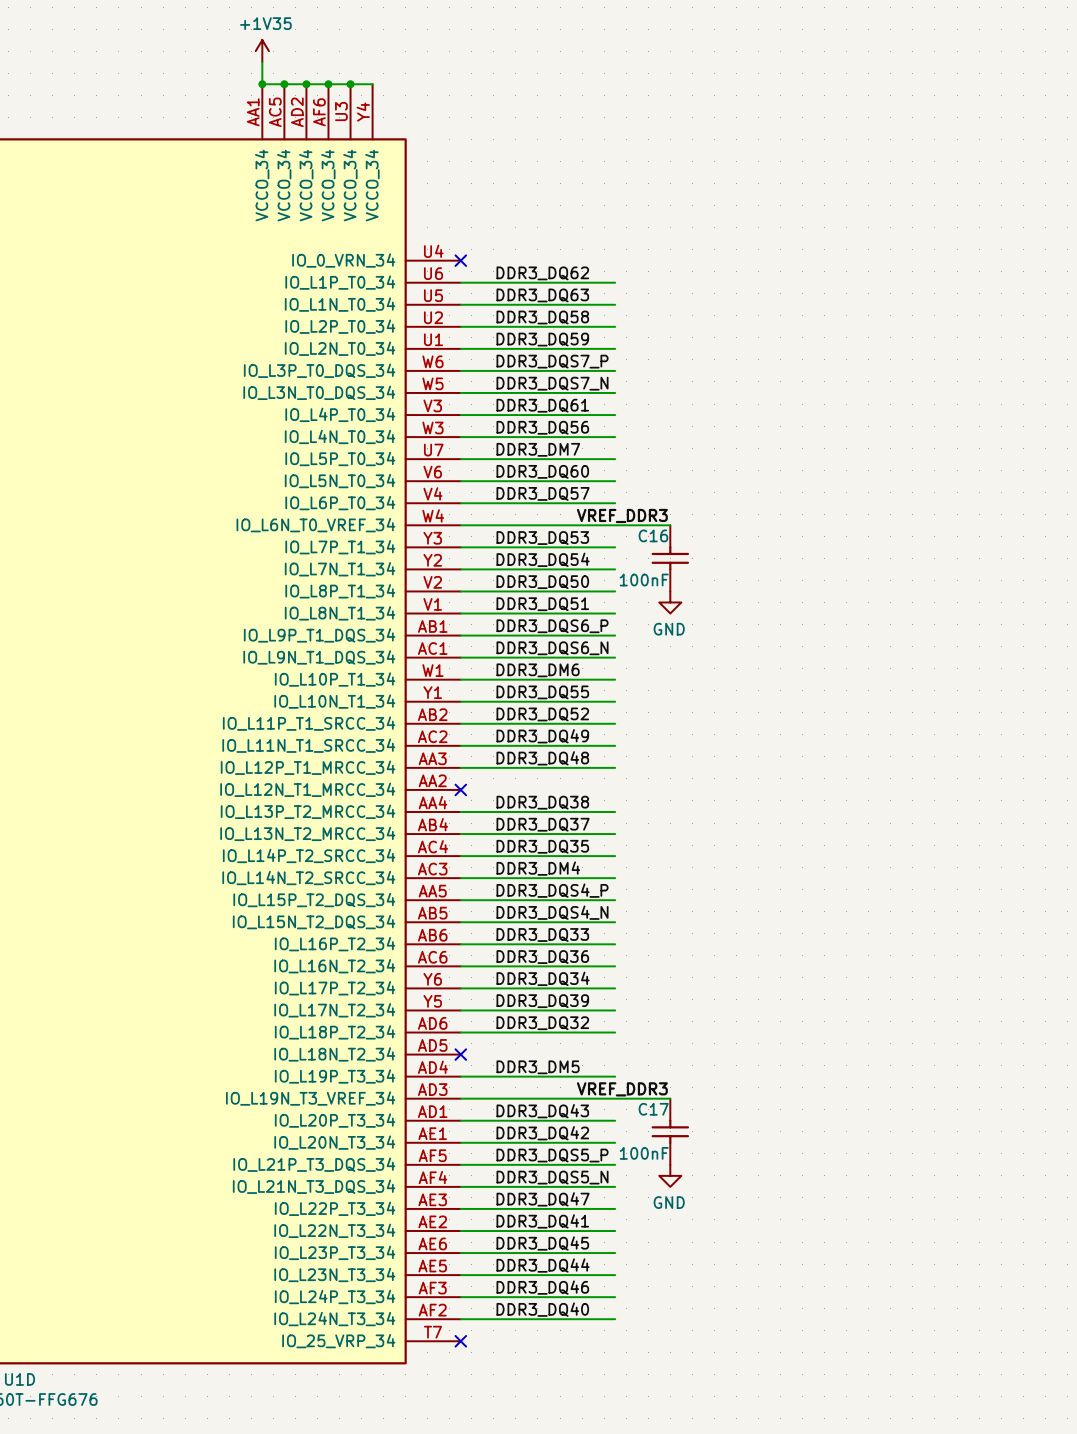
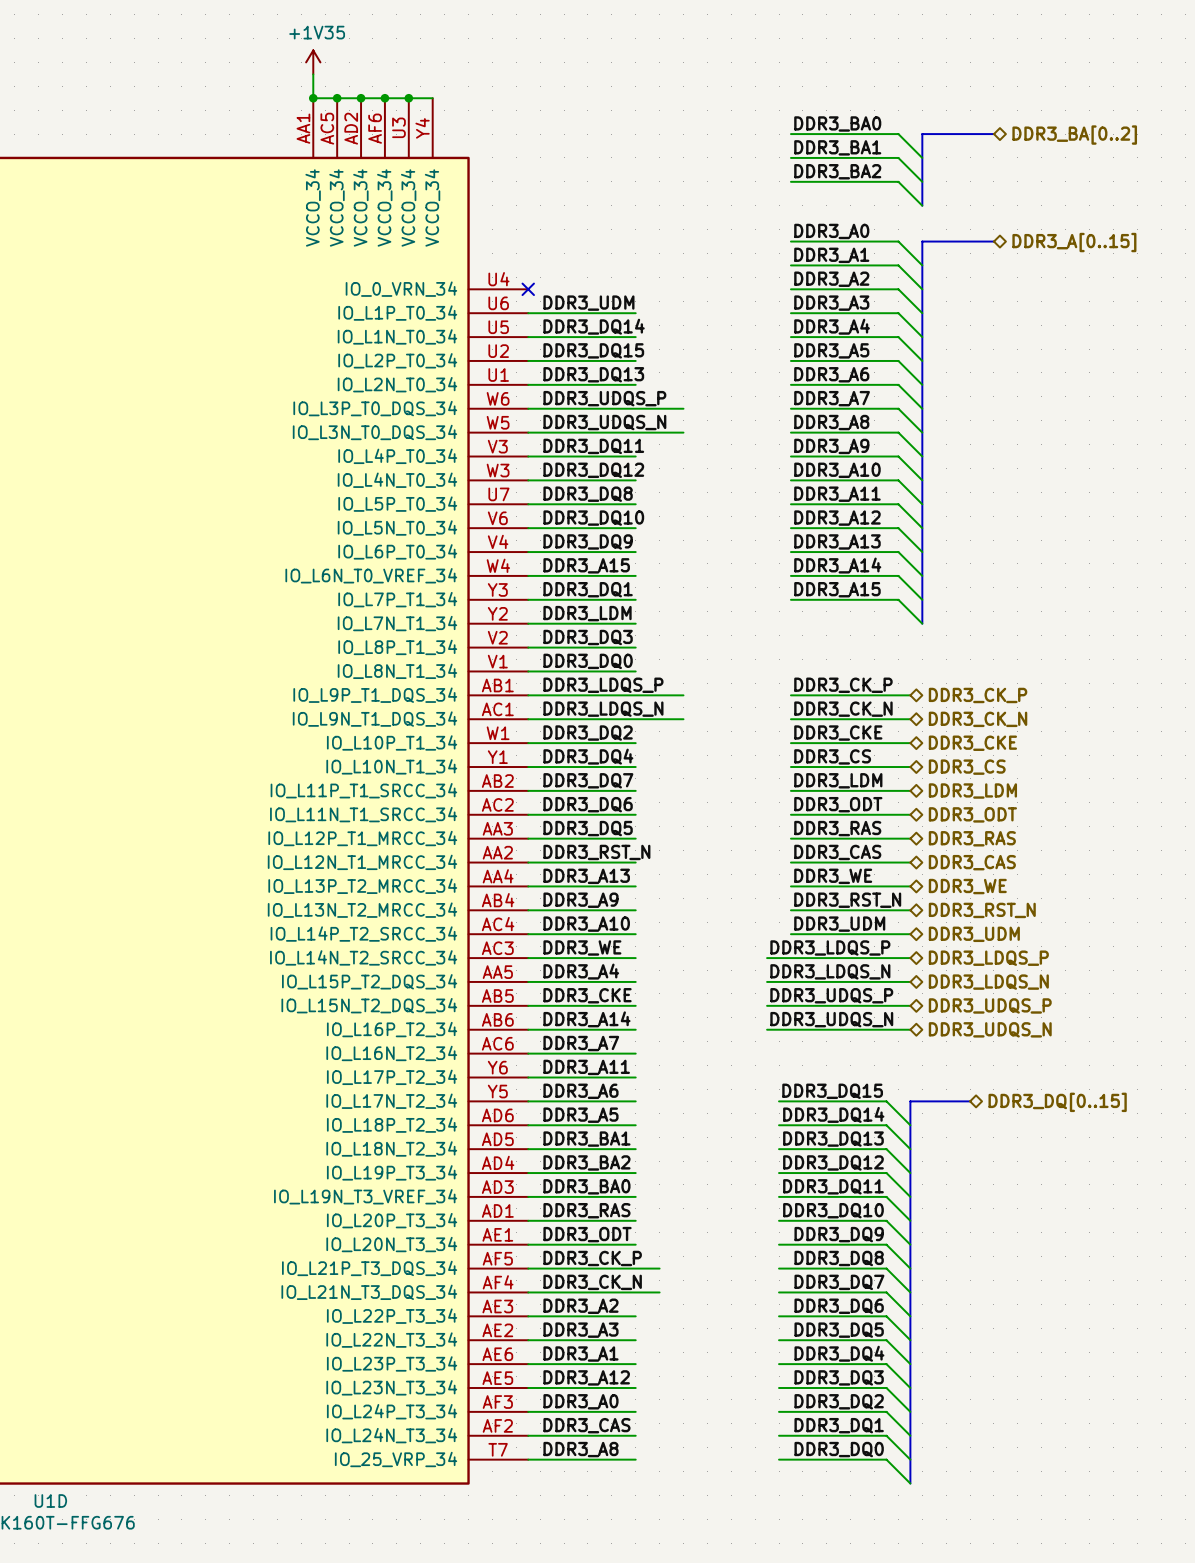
label: none -> DDR3_BA0 (837, 123)
wire: none -> (790, 134) (898, 134) (922, 157)
bus: none -> (993, 134) (922, 134) (922, 205)
hierarchical label: none -> DDR3_BA[0..2] (1074, 135)
label: none -> DDR3_BA1 (837, 147)
wire: none -> (790, 157) (898, 157) (922, 181)
label: none -> DDR3_BA2 (837, 171)
wire: none -> (790, 181) (898, 181) (922, 205)
label: none -> DDR3_A0 (831, 231)
wire: none -> (790, 241) (898, 241) (922, 265)
bus: none -> (993, 241) (922, 241) (922, 623)
hierarchical label: none -> DDR3_A[0..15] (1074, 242)
label: none -> DDR3_A1 (831, 255)
wire: none -> (790, 265) (898, 265) (922, 289)
label: none -> DDR3_A2 (831, 279)
wire: none -> (790, 289) (898, 289) (922, 313)
label: none -> DDR3_UDM (588, 303)
label: DDR3_DQ62 (542, 273) -> none
label: none -> DDR3_A3 (831, 303)
wire: (560, 282) (615, 282) -> none
wire: none -> (790, 313) (898, 313) (922, 337)
label: none -> DDR3_DQ14 (594, 326)
label: DDR3_DQ63 (542, 295) -> none
label: none -> DDR3_A4 (832, 326)
wire: (560, 304) (615, 304) -> none
wire: none -> (790, 337) (898, 337) (922, 360)
label: none -> DDR3_DQ15 (593, 350)
label: DDR3_DQ58 (542, 317) -> none
label: none -> DDR3_A5 (831, 350)
wire: (560, 326) (615, 326) -> none
wire: none -> (790, 360) (898, 360) (922, 384)
label: none -> DDR3_DQ13 (593, 374)
label: DDR3_DQ59 (542, 339) -> none
label: none -> DDR3_A6 (831, 374)
wire: (560, 348) (615, 348) -> none
wire: none -> (790, 384) (898, 384) (922, 408)
label: none -> DDR3_UDQS_P (604, 398)
label: DDR3_DQS7_P (552, 361) -> none
label: none -> DDR3_A7 (832, 398)
wire: (604, 370) (615, 370) -> none
wire: none -> (790, 408) (898, 408) (922, 432)
label: none -> DDR3_UDQS_N (604, 422)
label: DDR3_DQS7_N (552, 383) -> none
label: none -> DDR3_A8 (831, 422)
wire: (604, 392) (615, 392) -> none
wire: none -> (790, 432) (898, 432) (922, 456)
label: none -> DDR3_DQ11 (593, 446)
label: DDR3_DQ61 (542, 405) -> none
label: none -> DDR3_A9 (831, 446)
wire: (560, 415) (615, 415) -> none
wire: none -> (790, 456) (898, 456) (922, 480)
label: none -> DDR3_DQ12 (593, 470)
label: DDR3_DQ56 (542, 427) -> none
label: none -> DDR3_A10 (837, 470)
wire: (560, 437) (615, 437) -> none
wire: none -> (790, 480) (898, 480) (922, 504)
label: none -> DDR3_DQ8 (588, 494)
label: DDR3_DM7 (538, 449) -> none
label: none -> DDR3_A11 (837, 494)
wire: (560, 459) (615, 459) -> none
wire: none -> (790, 504) (898, 504) (922, 528)
label: none -> DDR3_DQ10 (593, 518)
label: DDR3_DQ60 (542, 471) -> none
label: none -> DDR3_A12 (837, 518)
wire: (560, 481) (615, 481) -> none
wire: none -> (790, 528) (898, 528) (922, 552)
label: none -> DDR3_DQ9 (588, 541)
label: DDR3_DQ57 (543, 493) -> none
label: none -> DDR3_A13 (837, 541)
wire: (560, 503) (615, 503) -> none
wire: none -> (790, 552) (898, 552) (922, 575)
label: none -> DDR3_A15 (586, 565)
label: VREF_DDR3 (622, 515) -> none
label: none -> DDR3_A14 (837, 565)
wire: (560, 525) (670, 525) -> (790, 695) (910, 695)
wire: none -> (790, 575) (898, 575) (922, 599)
label: none -> DDR3_DQ1 (588, 589)
label: DDR3_DQ53 (542, 538) -> none
label: none -> DDR3_A15 (837, 589)
wire: (560, 547) (615, 547) -> none
wire: none -> (790, 599) (898, 599) (922, 623)
C16: (670, 558) -> none
label: DDR3_DQ54 (543, 559) -> none
label: none -> DDR3_LDM (587, 613)
wire: (560, 569) (615, 569) -> none
label: none -> DDR3_DQ3 (588, 637)
label: DDR3_DQ50 (542, 582) -> none
wire: (560, 591) (615, 591) -> none
power symbol: GND (670, 602) -> none
label: none -> DDR3_DQ0 (588, 661)
label: DDR3_DQ51 (542, 604) -> none
wire: (560, 613) (615, 613) -> none
label: none -> DDR3_LDQS_P (603, 685)
label: DDR3_DQS6_P (552, 626) -> none
label: none -> DDR3_CK_P (843, 685)
wire: (604, 635) (615, 635) -> none
hierarchical label: none -> DDR3_CK_P (978, 695)
label: none -> DDR3_LDQS_N (603, 709)
label: DDR3_DQS6_N (552, 648) -> none
label: none -> DDR3_CK_N (843, 709)
wire: (604, 657) (615, 657) -> none
wire: none -> (790, 719) (910, 719)
hierarchical label: none -> DDR3_CK_N (978, 719)
label: none -> DDR3_DQ2 (588, 733)
label: DDR3_DM6 (538, 670) -> none
label: none -> DDR3_CKE (838, 733)
wire: (560, 679) (615, 679) -> none
wire: none -> (790, 743) (910, 743)
hierarchical label: none -> DDR3_CKE (972, 743)
label: none -> DDR3_DQ4 (588, 756)
label: DDR3_DQ55 (542, 692) -> none
label: none -> DDR3_CS (832, 756)
wire: (560, 701) (615, 701) -> none
wire: none -> (790, 767) (910, 767)
hierarchical label: none -> DDR3_CS (967, 767)
label: none -> DDR3_DQ7 (588, 780)
label: DDR3_DQ52 (542, 714) -> none
label: none -> DDR3_LDM (838, 780)
wire: (560, 723) (615, 723) -> none
wire: none -> (790, 790) (910, 790)
hierarchical label: none -> DDR3_LDM (972, 791)
label: none -> DDR3_DQ6 (588, 804)
label: DDR3_DQ49 (542, 736) -> none
label: none -> DDR3_ODT (838, 804)
wire: (560, 745) (615, 745) -> none
wire: none -> (790, 814) (910, 814)
hierarchical label: none -> DDR3_ODT (972, 814)
label: none -> DDR3_DQ5 (588, 828)
label: DDR3_DQ48 (542, 758) -> none
label: none -> DDR3_RAS (837, 828)
wire: (560, 767) (615, 767) -> none
wire: none -> (790, 838) (910, 838)
hierarchical label: none -> DDR3_RAS (972, 838)
label: none -> DDR3_RST_N (596, 852)
label: none -> DDR3_CAS (837, 852)
wire: none -> (528, 862) (635, 862)
no-connect mark: (460, 789) -> none
wire: none -> (790, 862) (910, 862)
hierarchical label: none -> DDR3_CAS (972, 862)
label: none -> DDR3_A13 (586, 876)
label: DDR3_DQ38 (542, 802) -> none
label: none -> DDR3_WE (833, 876)
wire: (560, 811) (615, 811) -> none
wire: none -> (790, 886) (910, 886)
hierarchical label: none -> DDR3_WE (967, 886)
label: none -> DDR3_A9 (580, 900)
label: DDR3_DQ37 (543, 824) -> none
label: none -> DDR3_RST_N (847, 900)
wire: (560, 834) (615, 834) -> none
wire: none -> (790, 910) (910, 910)
hierarchical label: none -> DDR3_RST_N (982, 910)
label: none -> DDR3_A10 (586, 924)
label: DDR3_DQ35 (542, 846) -> none
label: none -> DDR3_UDM (839, 924)
wire: (560, 856) (615, 856) -> none
wire: none -> (790, 934) (910, 934)
hierarchical label: none -> DDR3_UDM (974, 934)
label: none -> DDR3_WE (582, 947)
label: DDR3_DM4 (538, 868) -> none
label: none -> DDR3_LDQS_P (830, 947)
wire: (560, 878) (615, 878) -> none
wire: none -> (767, 958) (910, 958)
hierarchical label: none -> DDR3_LDQS_P (988, 958)
label: none -> DDR3_A4 (581, 971)
label: DDR3_DQS4_P (552, 890) -> none
label: none -> DDR3_LDQS_N (830, 971)
wire: (560, 900) (615, 900) -> none
wire: none -> (767, 981) (910, 981)
hierarchical label: none -> DDR3_LDQS_N (988, 982)
label: none -> DDR3_CKE (587, 995)
label: DDR3_DQS4_N (552, 912) -> none
label: none -> DDR3_UDQS_P (831, 995)
wire: (560, 922) (615, 922) -> none
wire: none -> (767, 1005) (910, 1005)
hierarchical label: none -> DDR3_UDQS_P (990, 1005)
label: none -> DDR3_A14 (586, 1019)
label: DDR3_DQ33 (542, 934) -> none
label: none -> DDR3_UDQS_N (831, 1019)
wire: (560, 944) (615, 944) -> none
wire: none -> (767, 1029) (910, 1029)
hierarchical label: none -> DDR3_UDQS_N (990, 1029)
label: none -> DDR3_A7 (581, 1043)
label: DDR3_DQ36 (542, 957) -> none
wire: (560, 966) (615, 966) -> none
label: DDR3_DQ34 (543, 978) -> none
label: none -> DDR3_A11 (586, 1067)
wire: (560, 988) (615, 988) -> none
label: none -> DDR3_A6 (580, 1091)
label: DDR3_DQ39 (542, 1001) -> none
label: none -> DDR3_DQ15 (832, 1091)
wire: (560, 1010) (615, 1010) -> none
wire: none -> (779, 1101) (886, 1101) (910, 1125)
bus: none -> (970, 1101) (910, 1101) (910, 1483)
hierarchical label: none -> DDR3_DQ[0..15] (1057, 1102)
label: none -> DDR3_DQ14 (833, 1114)
label: none -> DDR3_A5 (580, 1115)
label: DDR3_DQ32 (542, 1023) -> none
wire: (560, 1032) (615, 1032) -> none
wire: none -> (779, 1125) (886, 1125) (910, 1149)
label: none -> DDR3_BA1 (586, 1139)
label: none -> DDR3_DQ13 (833, 1139)
wire: none -> (528, 1149) (635, 1149)
no-connect mark: (460, 1054) -> none
wire: none -> (779, 1149) (886, 1149) (910, 1173)
label: none -> DDR3_BA2 (586, 1162)
label: DDR3_DM5 (538, 1067) -> none
label: none -> DDR3_DQ12 (833, 1162)
wire: (560, 1076) (615, 1076) -> none
wire: none -> (779, 1173) (886, 1173) (910, 1196)
label: none -> DDR3_BA0 (586, 1186)
label: VREF_DDR3 (622, 1089) -> none
label: none -> DDR3_DQ11 (833, 1186)
wire: (560, 1098) (670, 1098) -> none
wire: none -> (779, 1196) (886, 1196) (910, 1220)
label: none -> DDR3_RAS (586, 1210)
label: DDR3_DQ43 (542, 1111) -> none
label: none -> DDR3_DQ10 (833, 1210)
wire: (560, 1120) (615, 1120) -> none
wire: none -> (779, 1220) (886, 1220) (910, 1244)
C17: (670, 1131) -> none
label: none -> DDR3_ODT (587, 1234)
label: DDR3_DQ42 (542, 1133) -> none
label: none -> DDR3_DQ9 (839, 1234)
wire: (560, 1142) (615, 1142) -> none
wire: none -> (779, 1244) (886, 1244) (910, 1268)
label: none -> DDR3_CK_P (592, 1258)
label: DDR3_DQS5_P (552, 1155) -> none
label: none -> DDR3_DQ8 (839, 1258)
wire: (582, 1164) (615, 1164) -> none
wire: none -> (779, 1268) (886, 1268) (910, 1292)
power symbol: GND (670, 1175) -> none
label: DDR3_DQS5_N (552, 1177) -> DDR3_CK_N (592, 1282)
label: none -> DDR3_DQ7 (839, 1282)
wire: (582, 1186) (615, 1186) -> none
wire: none -> (779, 1292) (886, 1292) (910, 1316)
label: none -> DDR3_A2 (580, 1306)
label: DDR3_DQ47 (543, 1199) -> none
label: none -> DDR3_DQ6 (839, 1306)
wire: (560, 1208) (615, 1208) -> none
wire: none -> (779, 1316) (886, 1316) (910, 1340)
label: none -> DDR3_A3 (580, 1330)
label: DDR3_DQ41 (542, 1221) -> none
label: none -> DDR3_DQ5 (839, 1330)
wire: (560, 1231) (615, 1231) -> none
wire: none -> (779, 1340) (886, 1340) (910, 1364)
label: none -> DDR3_A1 (580, 1354)
label: DDR3_DQ45 (542, 1243) -> none
label: none -> DDR3_DQ4 (839, 1353)
wire: (560, 1253) (615, 1253) -> none
wire: none -> (779, 1364) (886, 1364) (910, 1387)
label: none -> DDR3_A12 (586, 1377)
label: DDR3_DQ44 (543, 1265) -> none
label: none -> DDR3_DQ3 (839, 1377)
wire: (560, 1275) (615, 1275) -> none
wire: none -> (779, 1387) (886, 1387) (910, 1411)
label: none -> DDR3_A0 (580, 1401)
label: DDR3_DQ46 (542, 1287) -> none
label: none -> DDR3_DQ2 (839, 1401)
wire: (560, 1297) (615, 1297) -> none
wire: none -> (779, 1411) (886, 1411) (910, 1435)
label: none -> DDR3_CAS (586, 1425)
label: DDR3_DQ40 (542, 1309) -> none
label: none -> DDR3_DQ1 (839, 1425)
wire: (560, 1319) (615, 1319) -> none
wire: none -> (779, 1435) (886, 1435) (910, 1459)
label: none -> DDR3_A8 (580, 1449)
label: none -> DDR3_DQ0 (839, 1449)
wire: none -> (528, 1459) (635, 1459)
no-connect mark: (460, 1341) -> none
wire: none -> (779, 1459) (886, 1459) (910, 1483)

